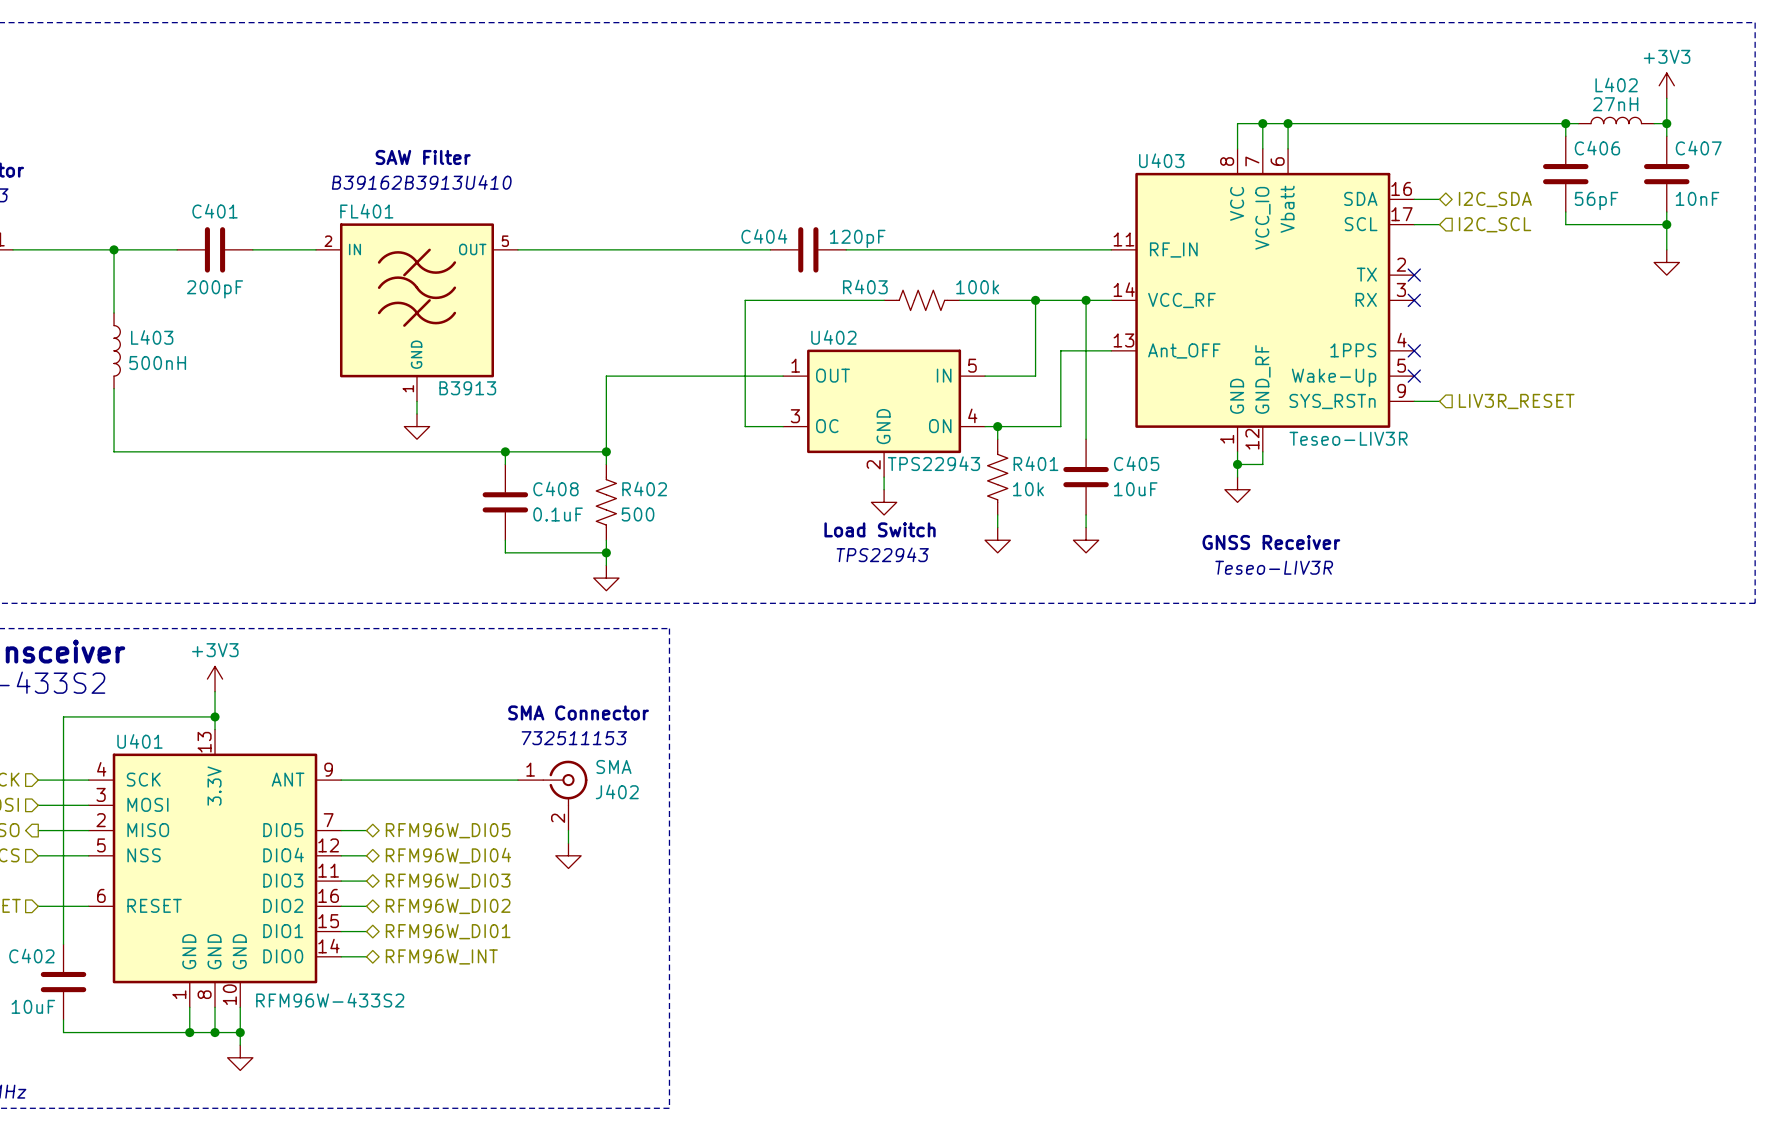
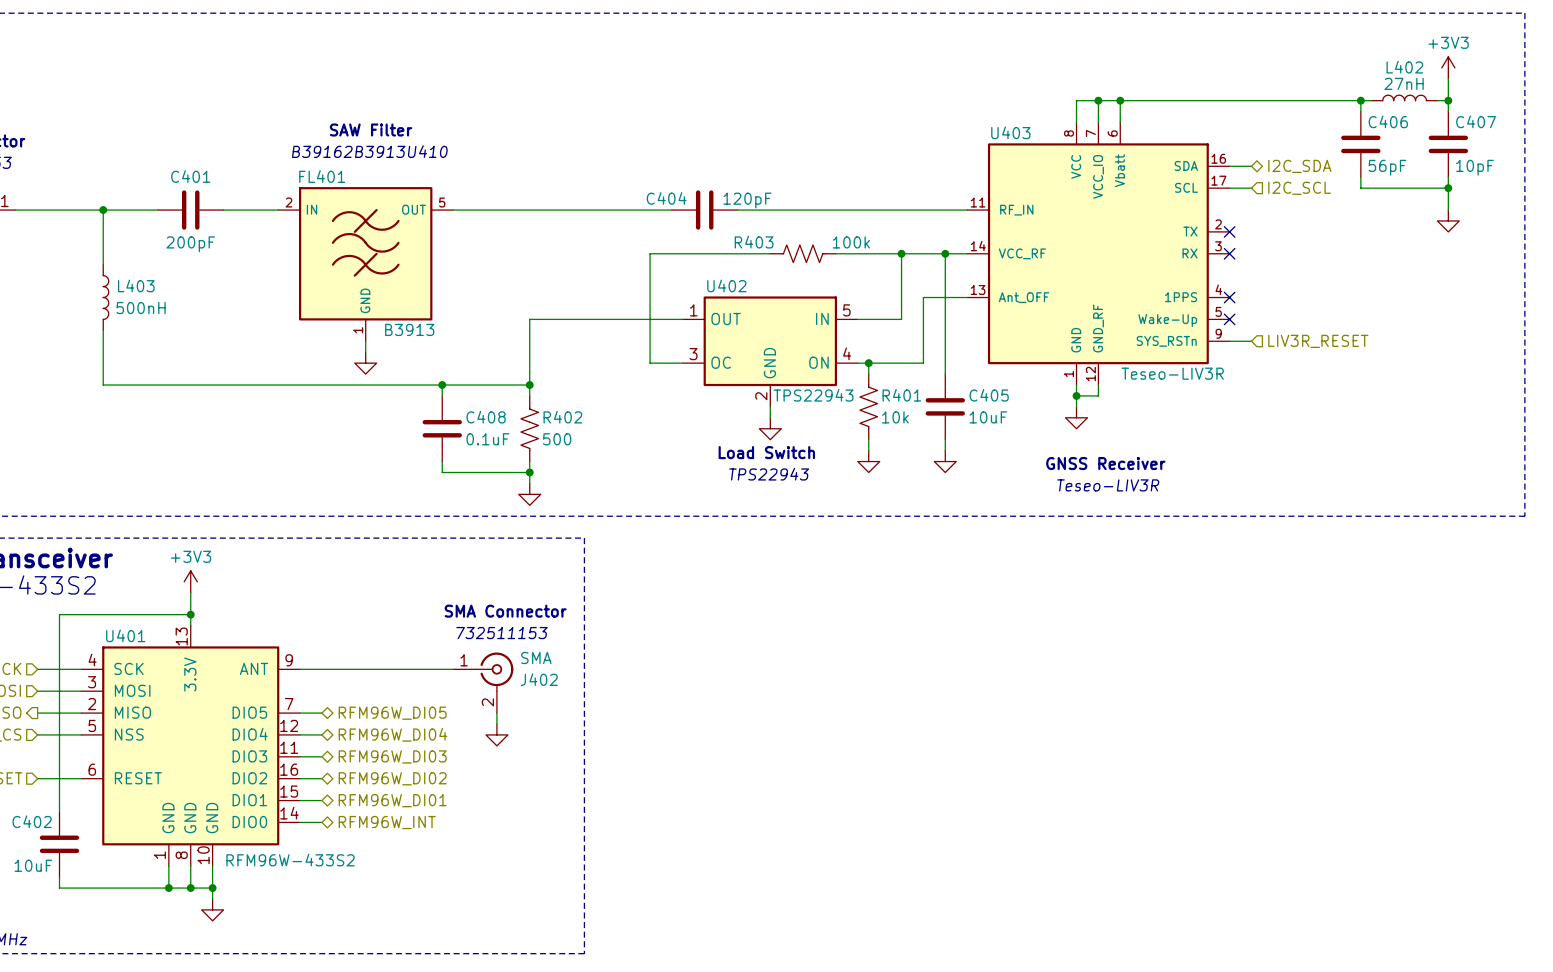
U403 symbol: [1111, 148, 1415, 452] -> [967, 122, 1230, 386]
C407 value: 10nF (1697, 198) -> 10pF (1474, 167)

